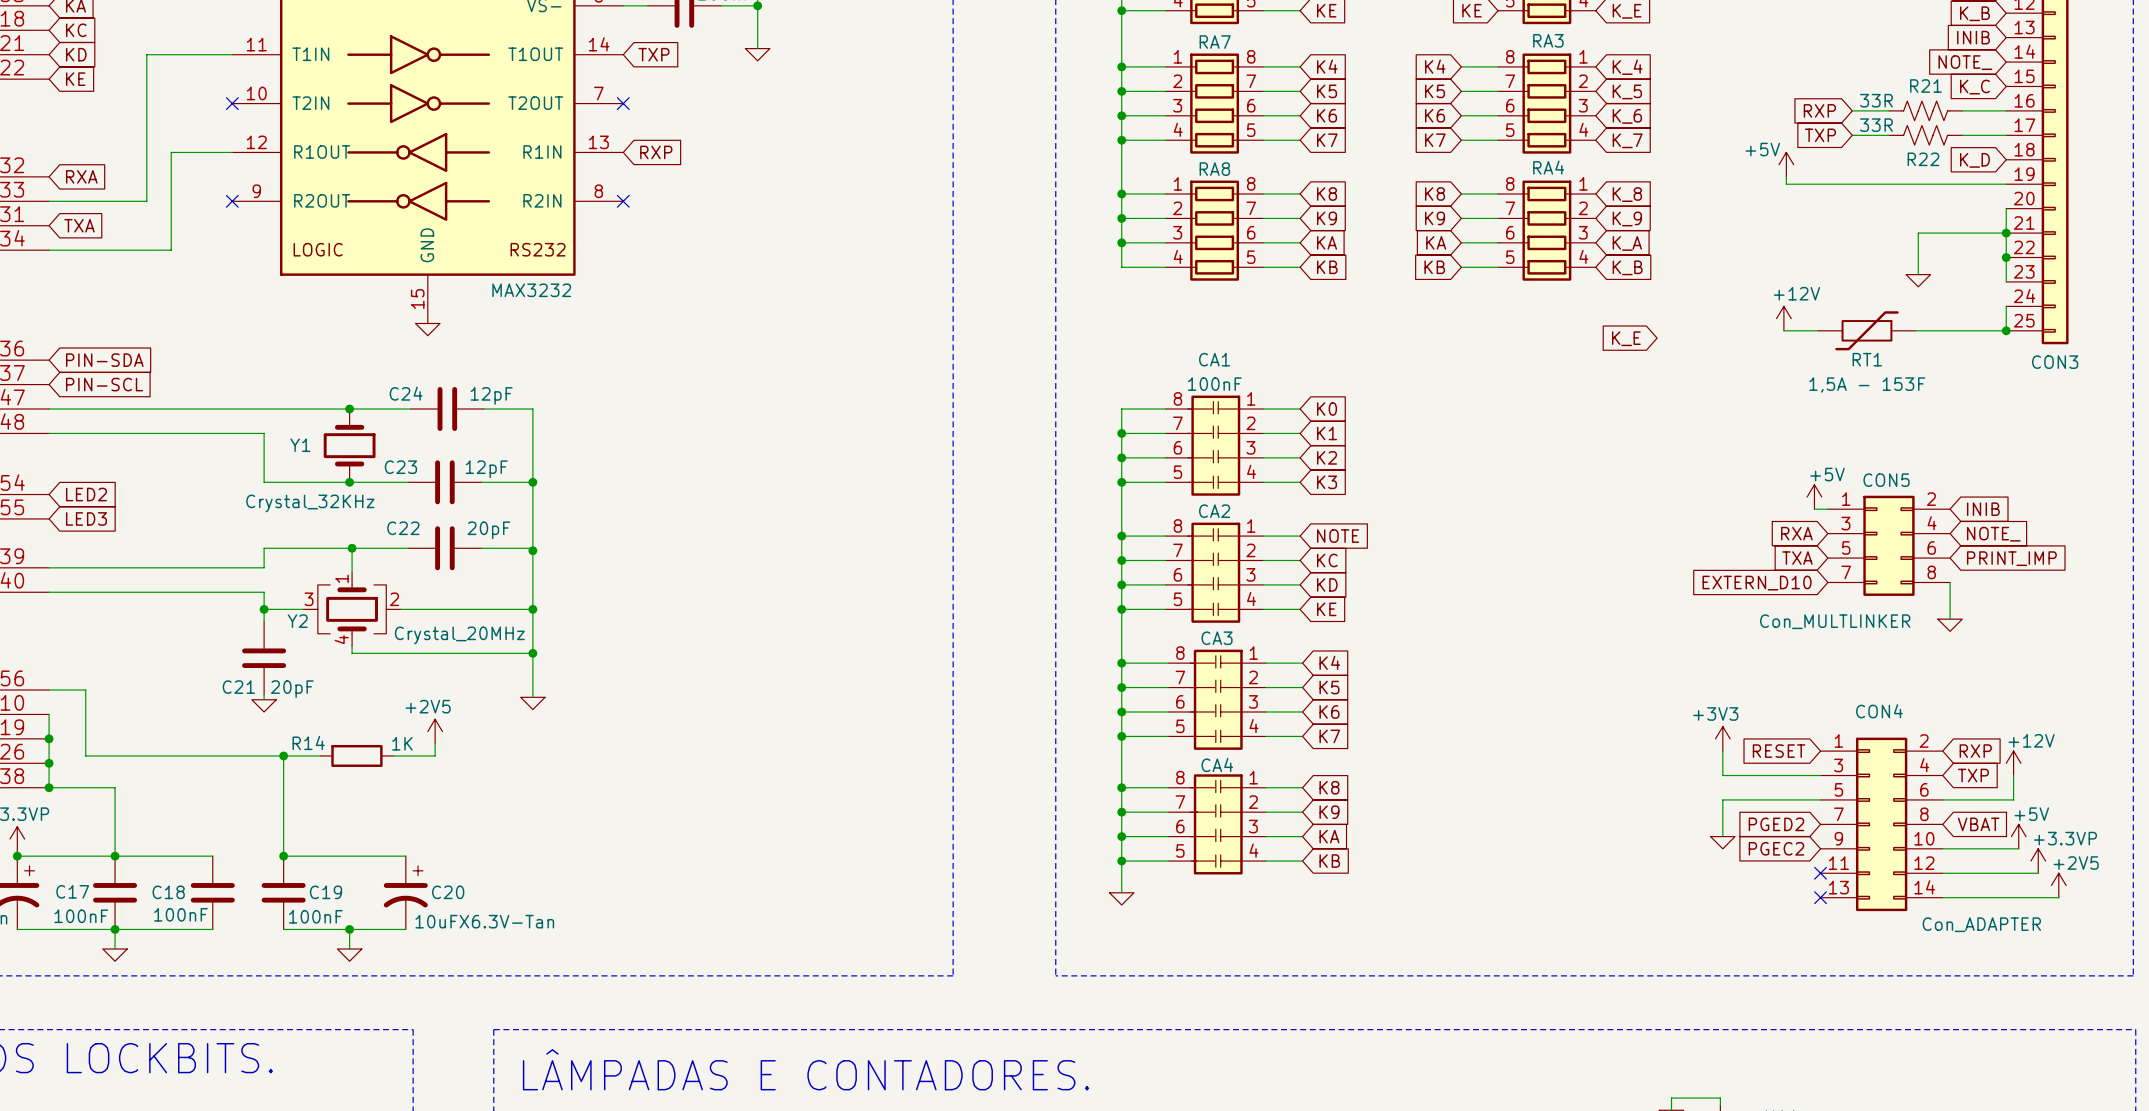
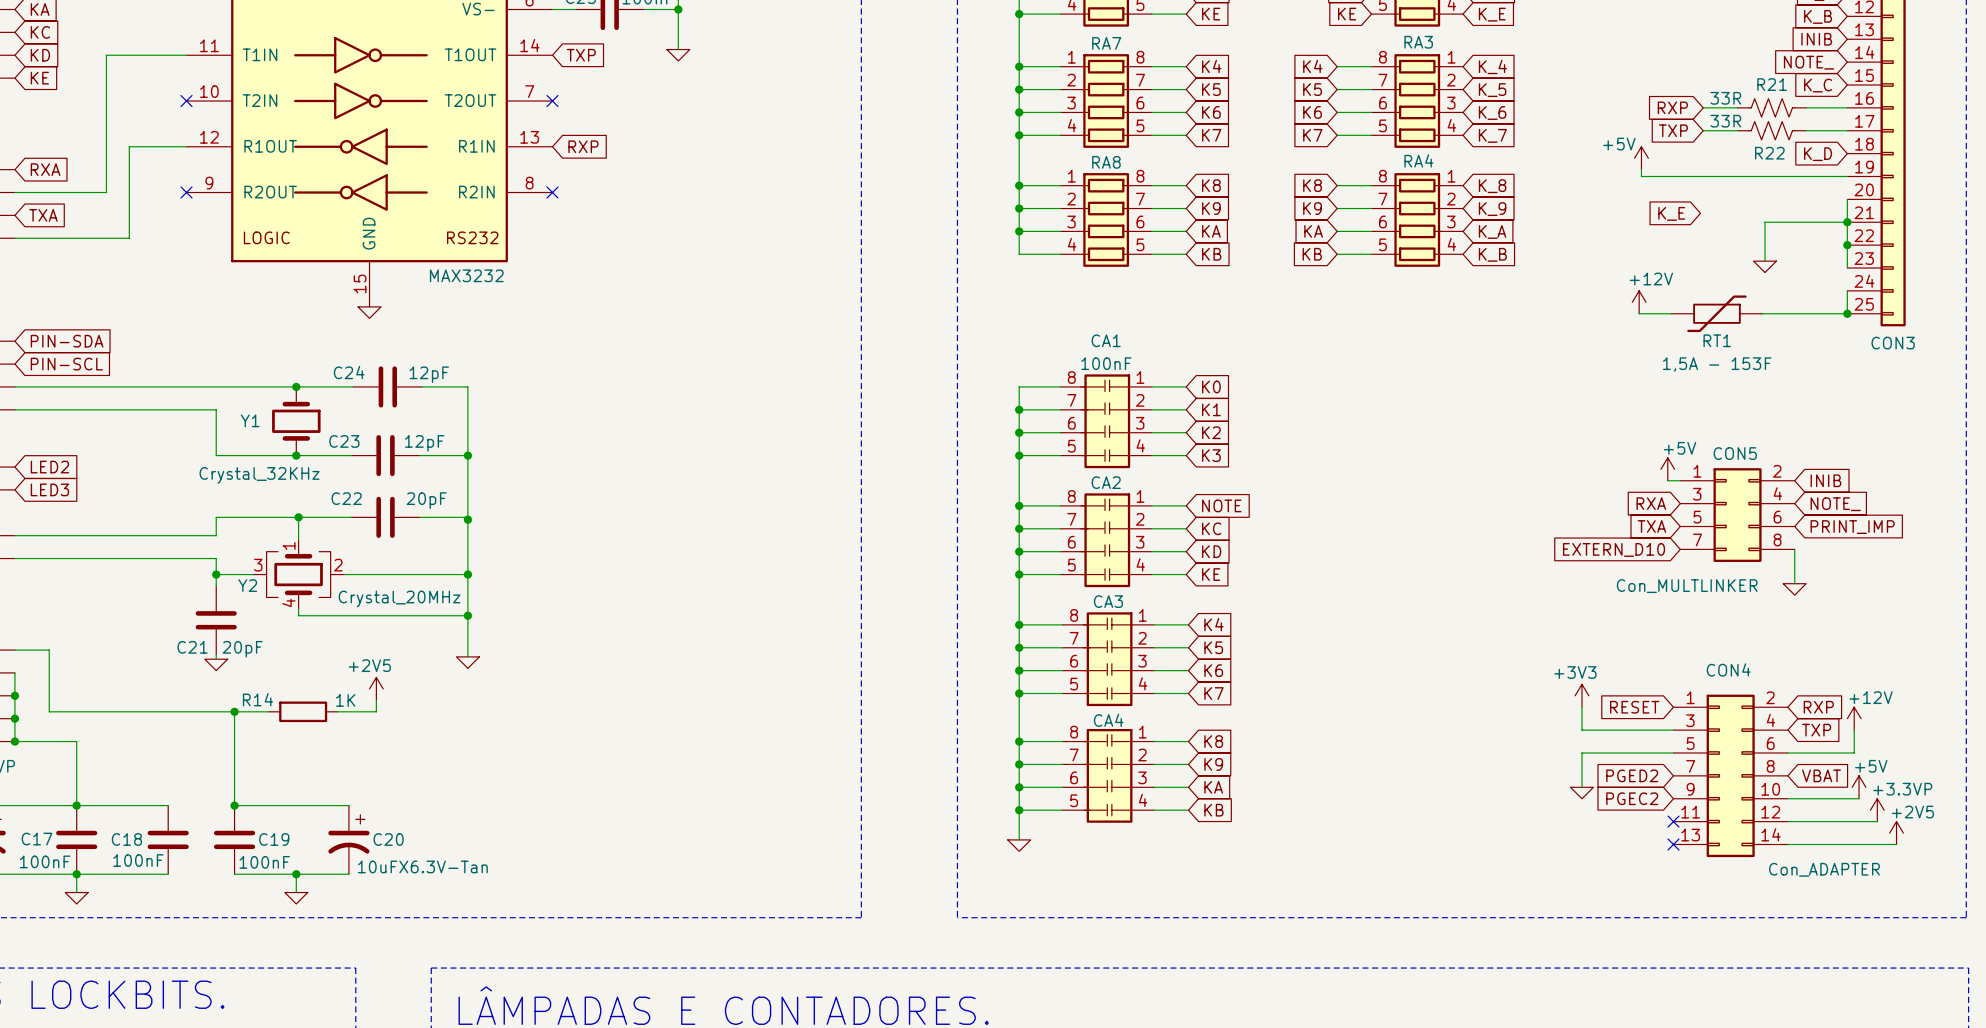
global label position: K_E (1626, 338) -> K_E (1671, 213)

